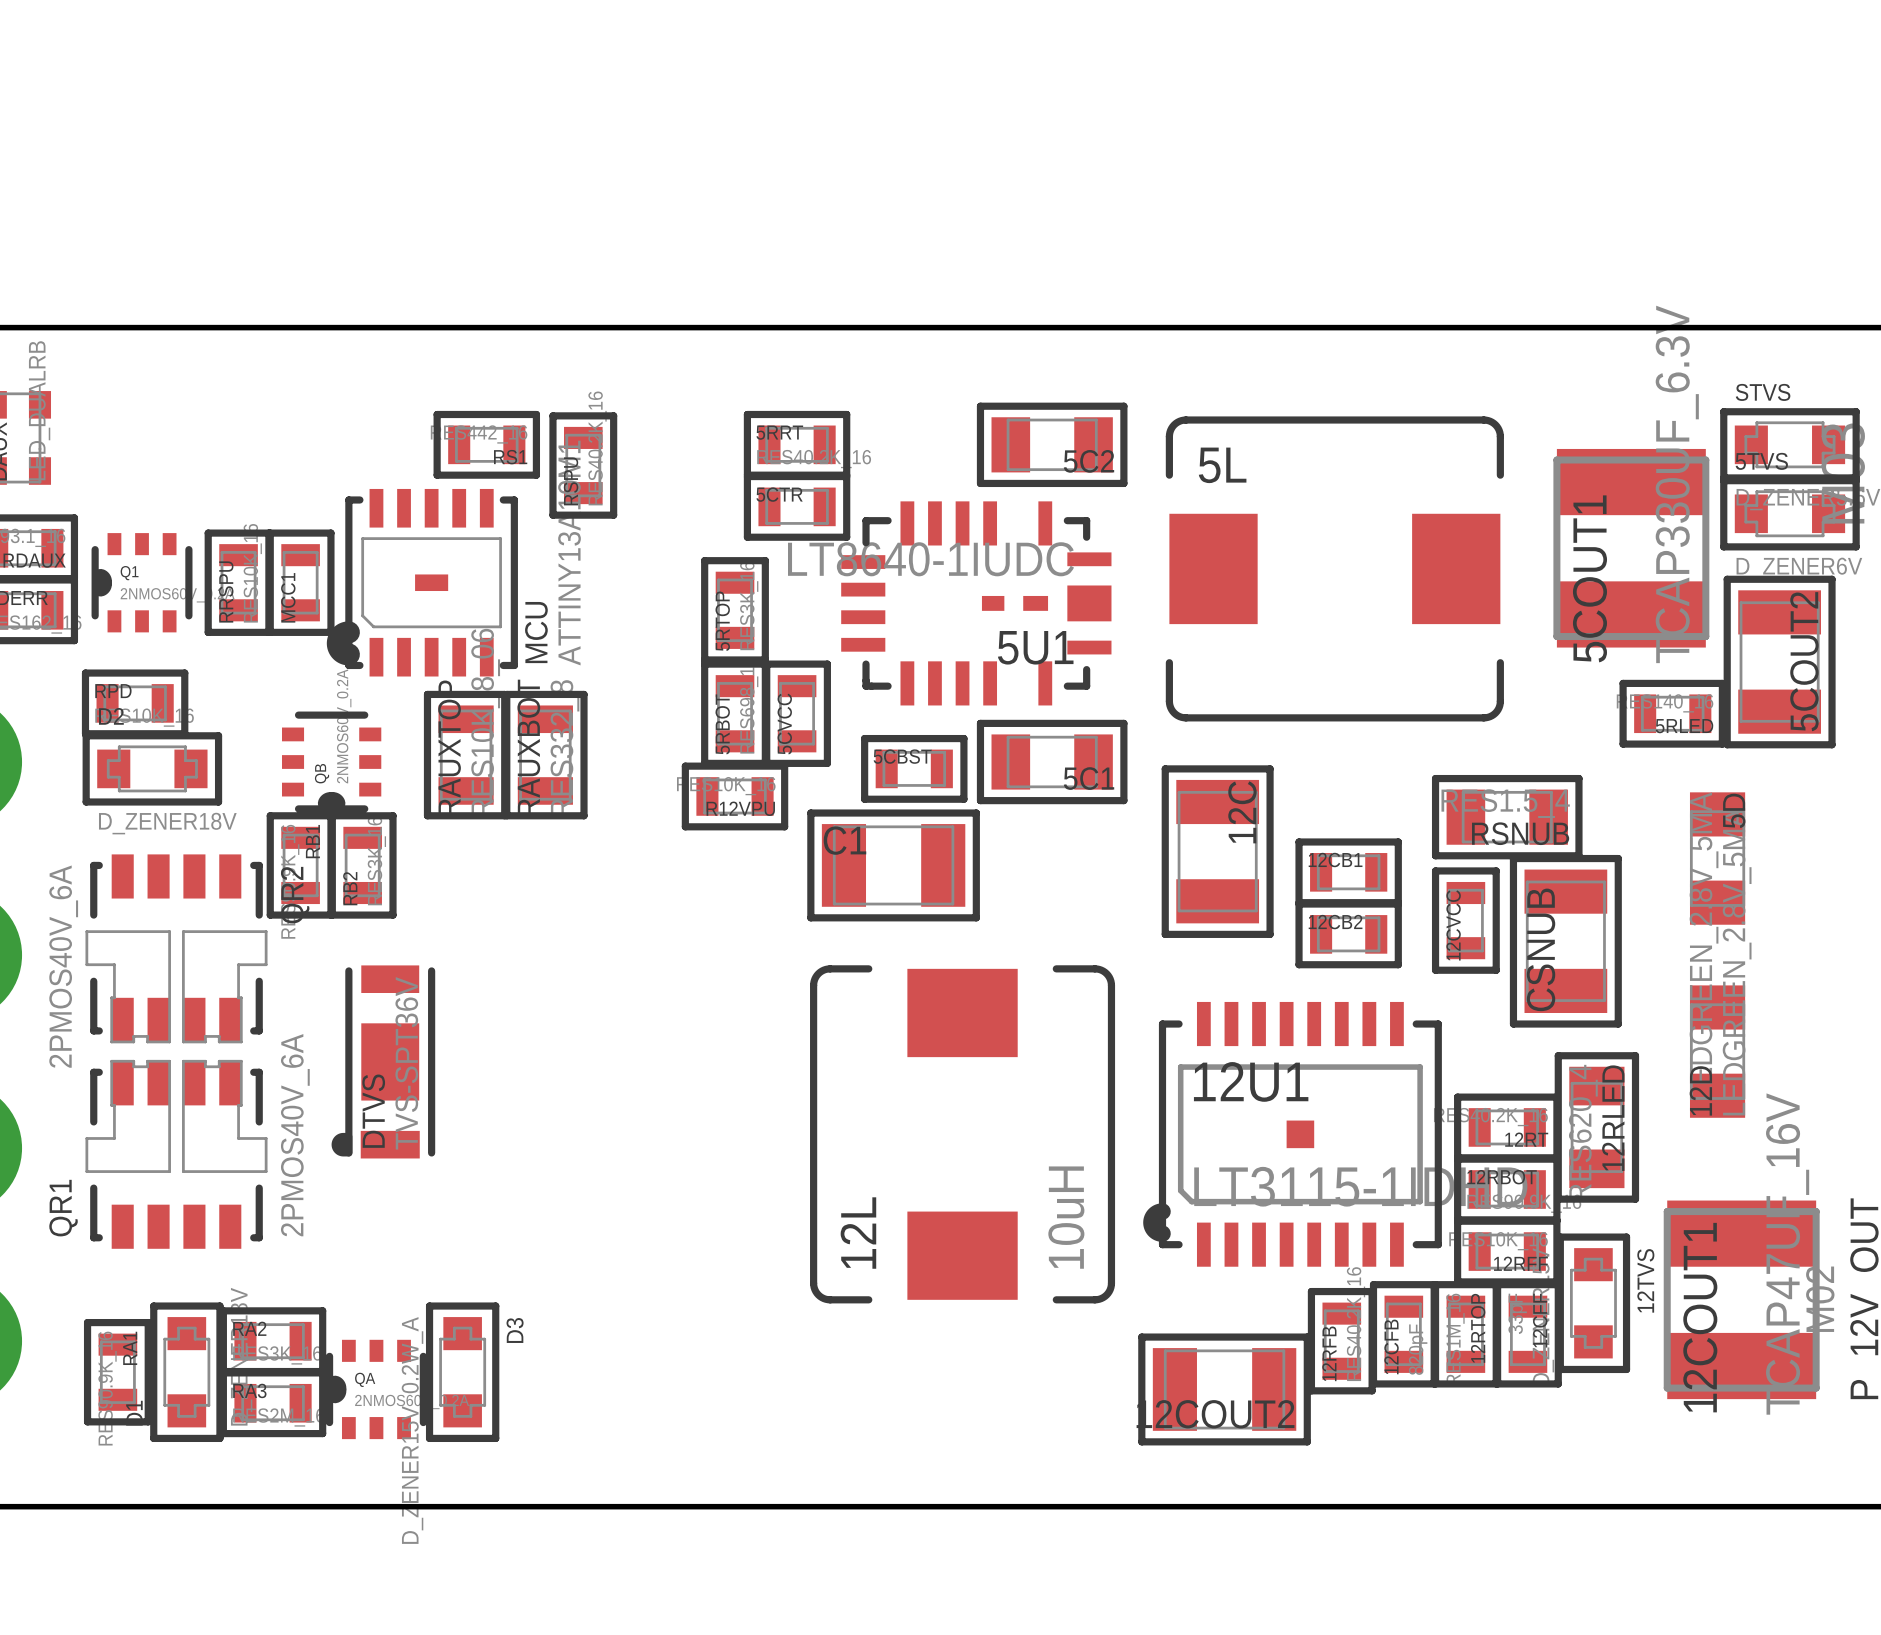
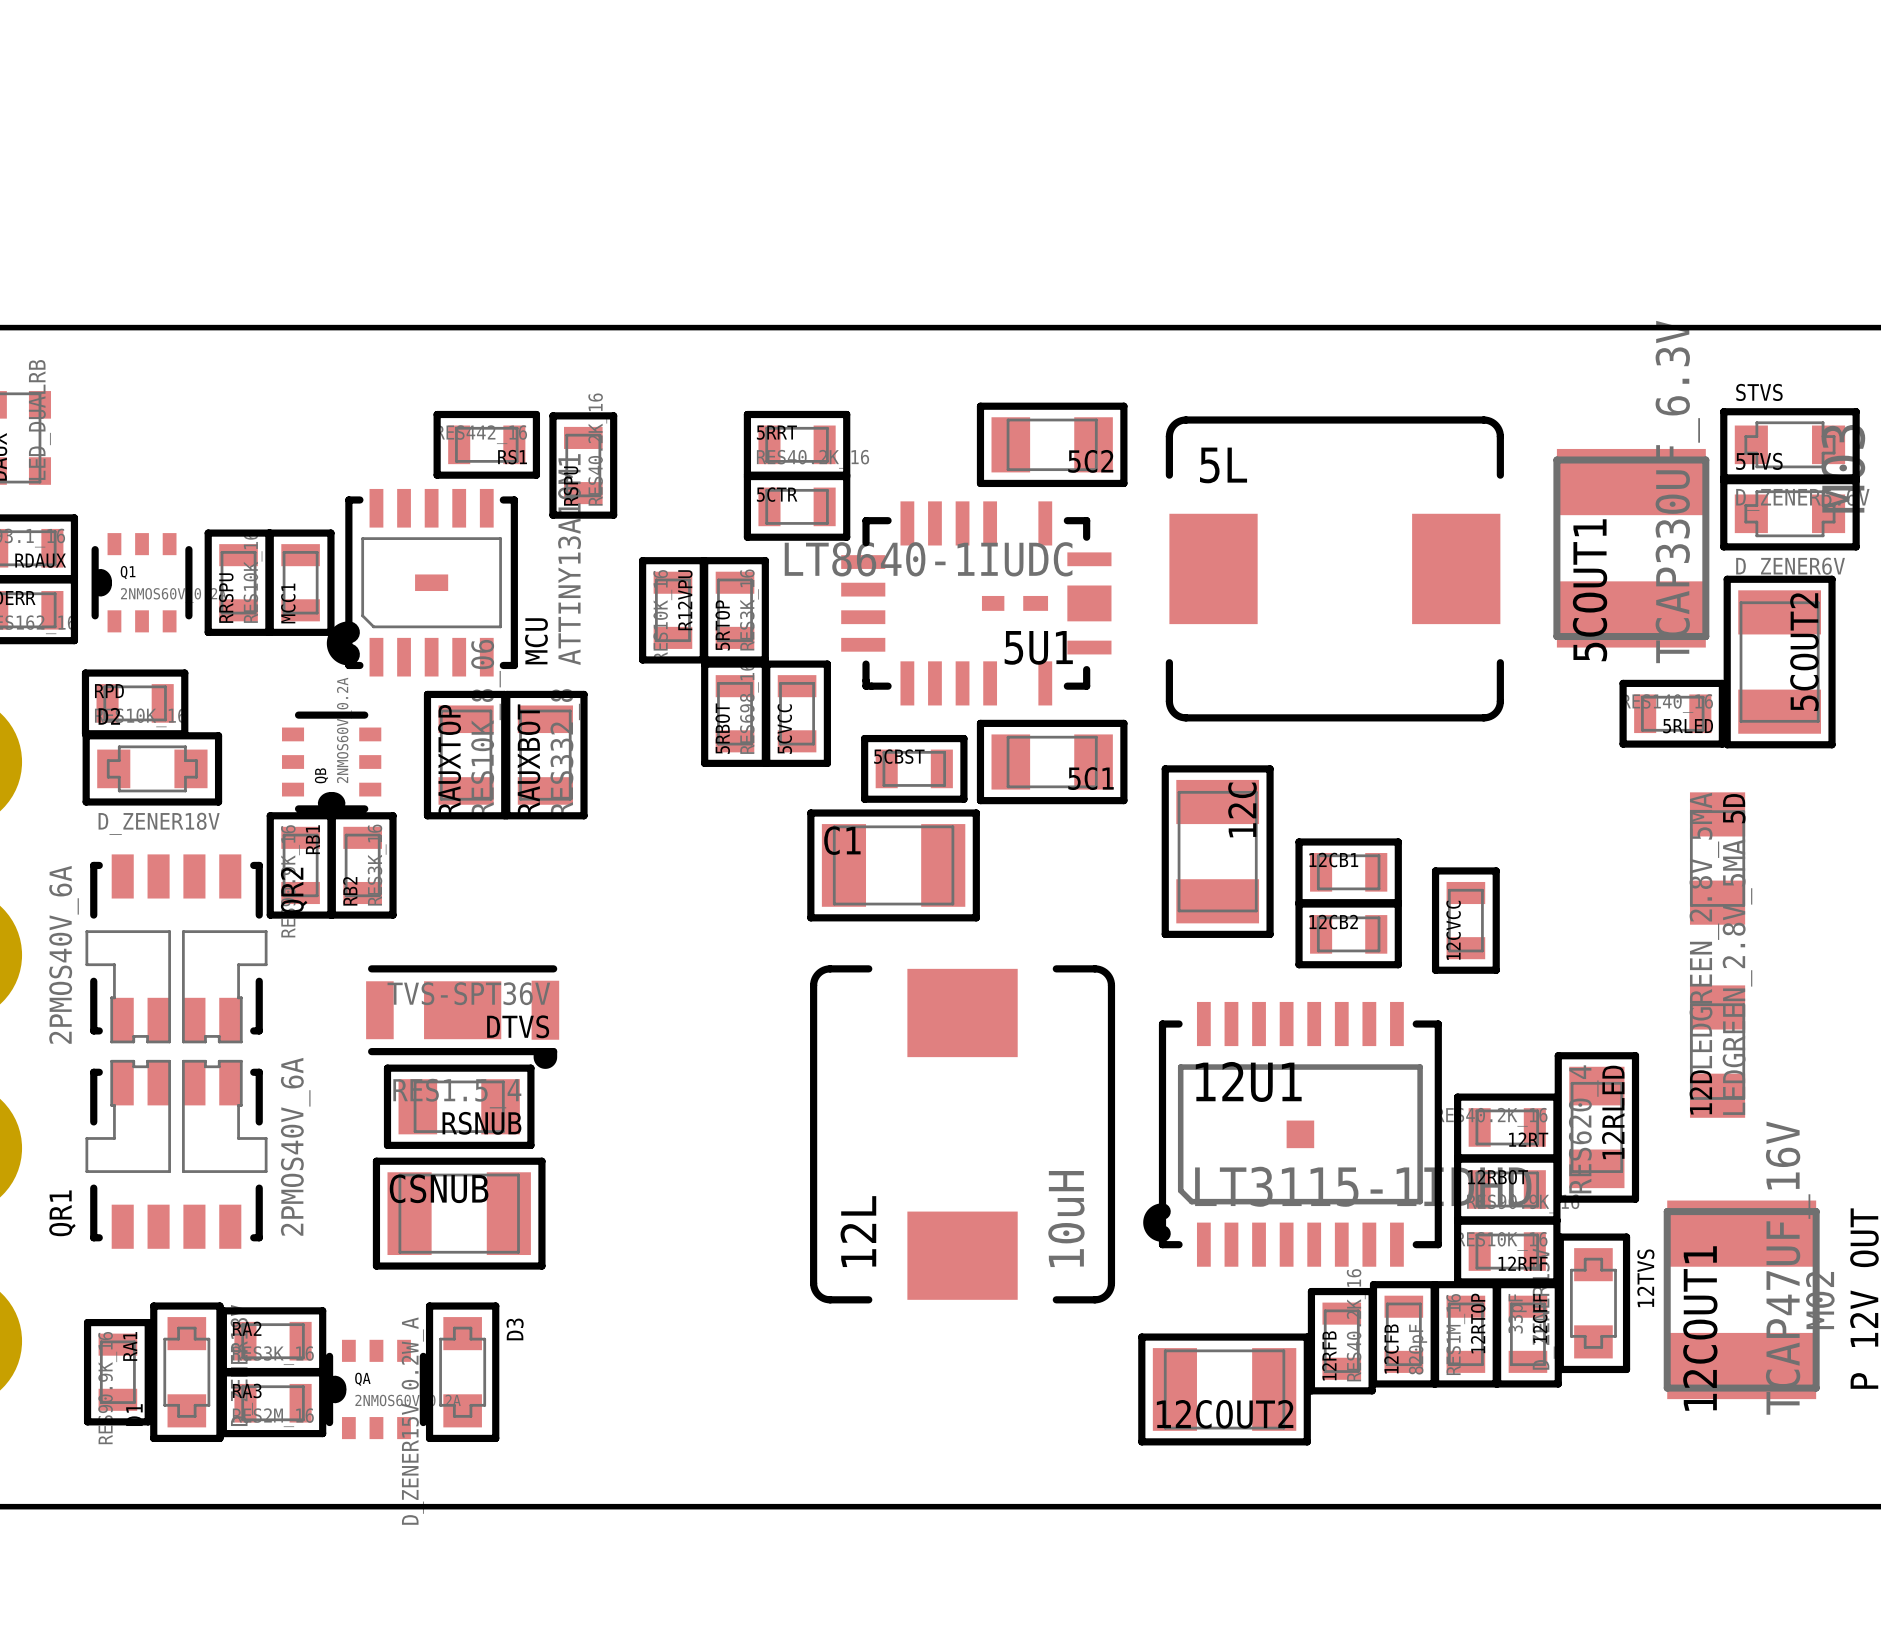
R12VPU rotation: 0° (735, 796) -> 90° clockwise (672, 610)
R12VPU position: (735, 796) -> (672, 610)
RSNUB position: (1507, 817) -> (459, 1106)
CSNUB rotation: 0° (1565, 941) -> 90° clockwise (459, 1213)
CSNUB position: (1565, 941) -> (459, 1213)
DTVS rotation: 0° (383, 1061) -> 90° counterclockwise (462, 1017)

